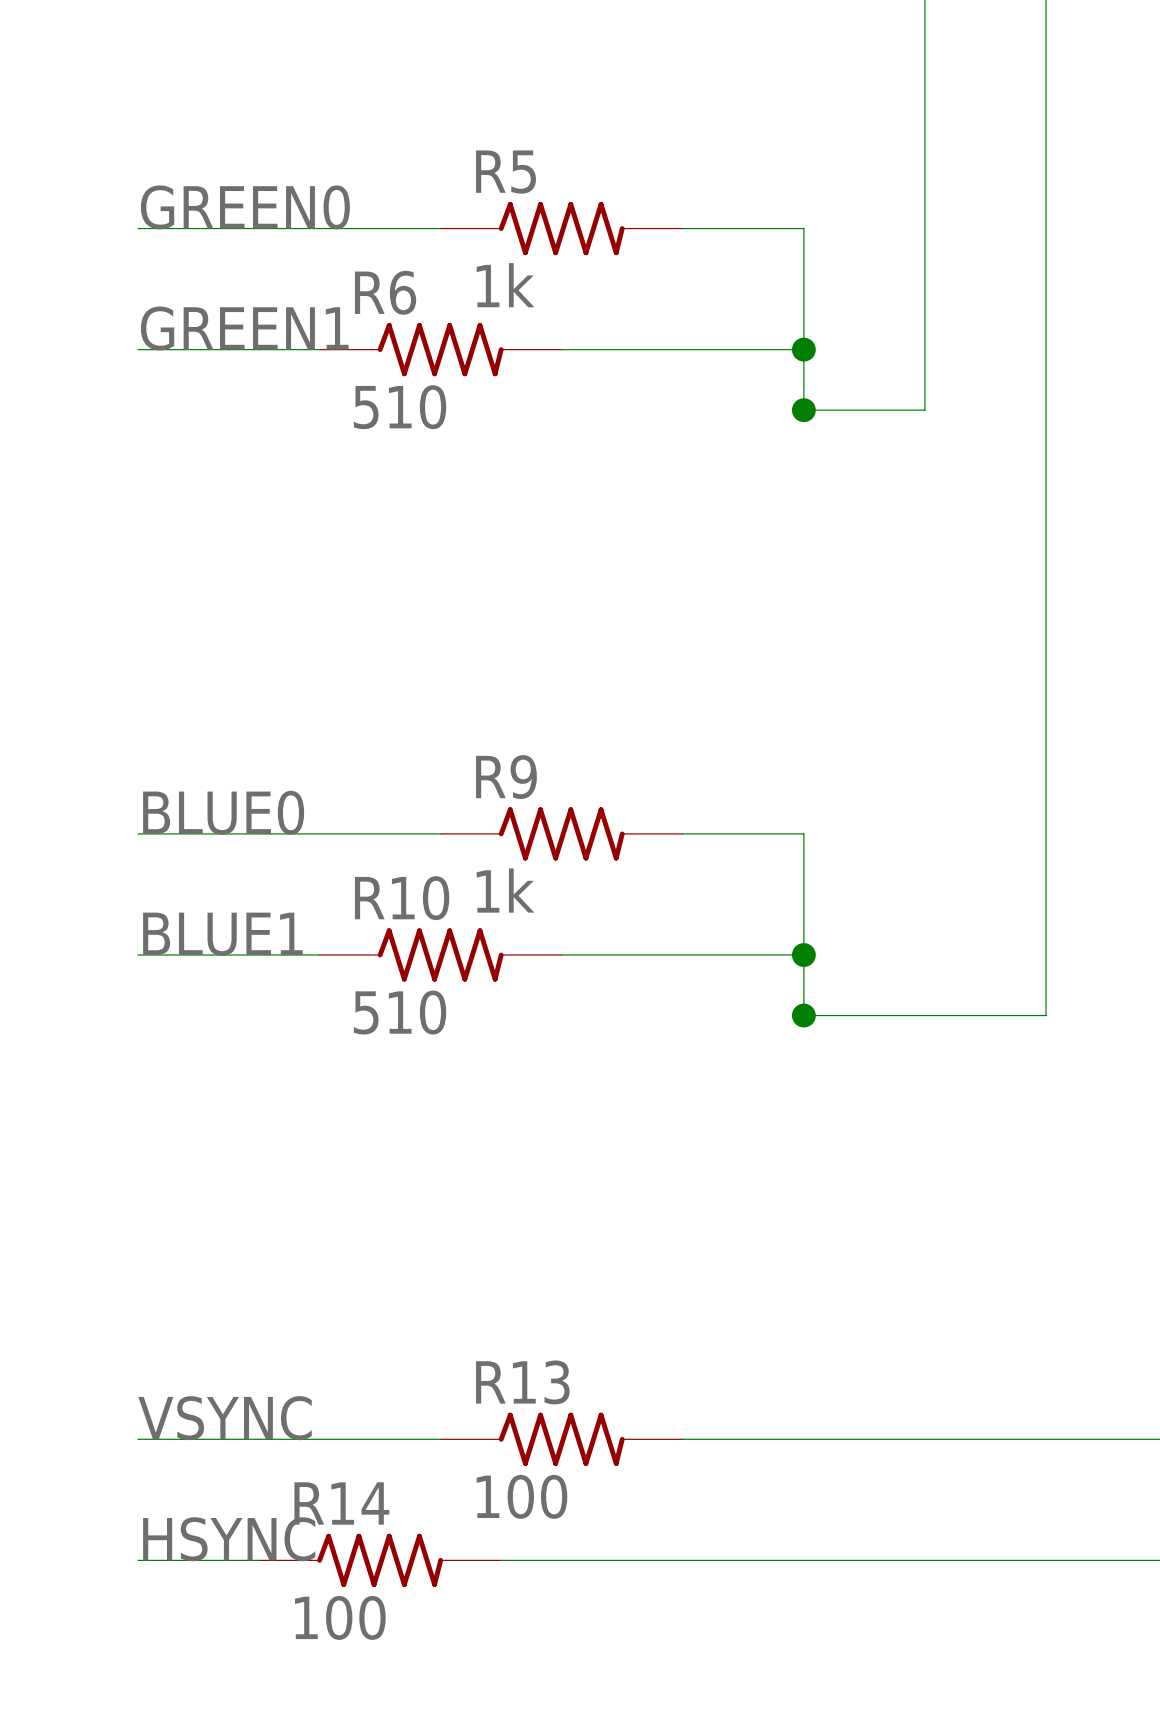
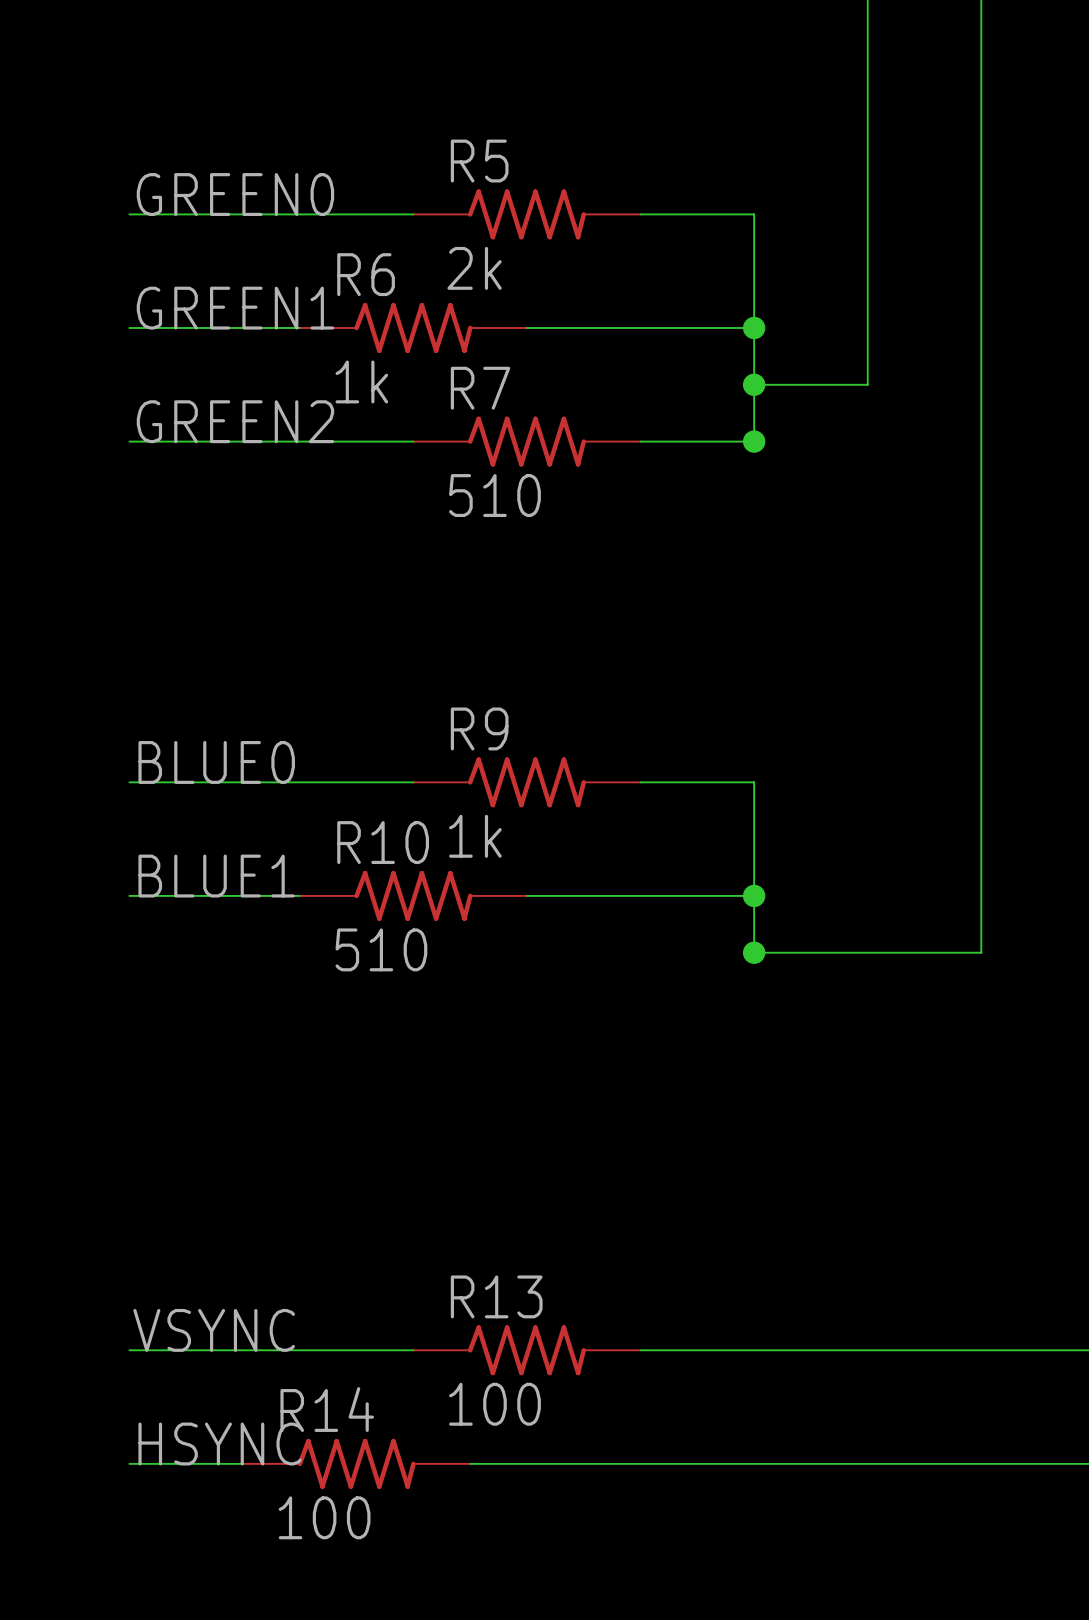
R5 value: 1k (505, 285) -> 2k (474, 268)
R6 value: 510 (400, 407) -> 1k (361, 381)
wire: none -> (754, 384) (754, 441) (640, 441)
label: none -> GREEN2 (235, 421)
wire: none -> (129, 441) (413, 441)
R7: none -> 510 (526, 441)
junction: none -> (754, 441)

